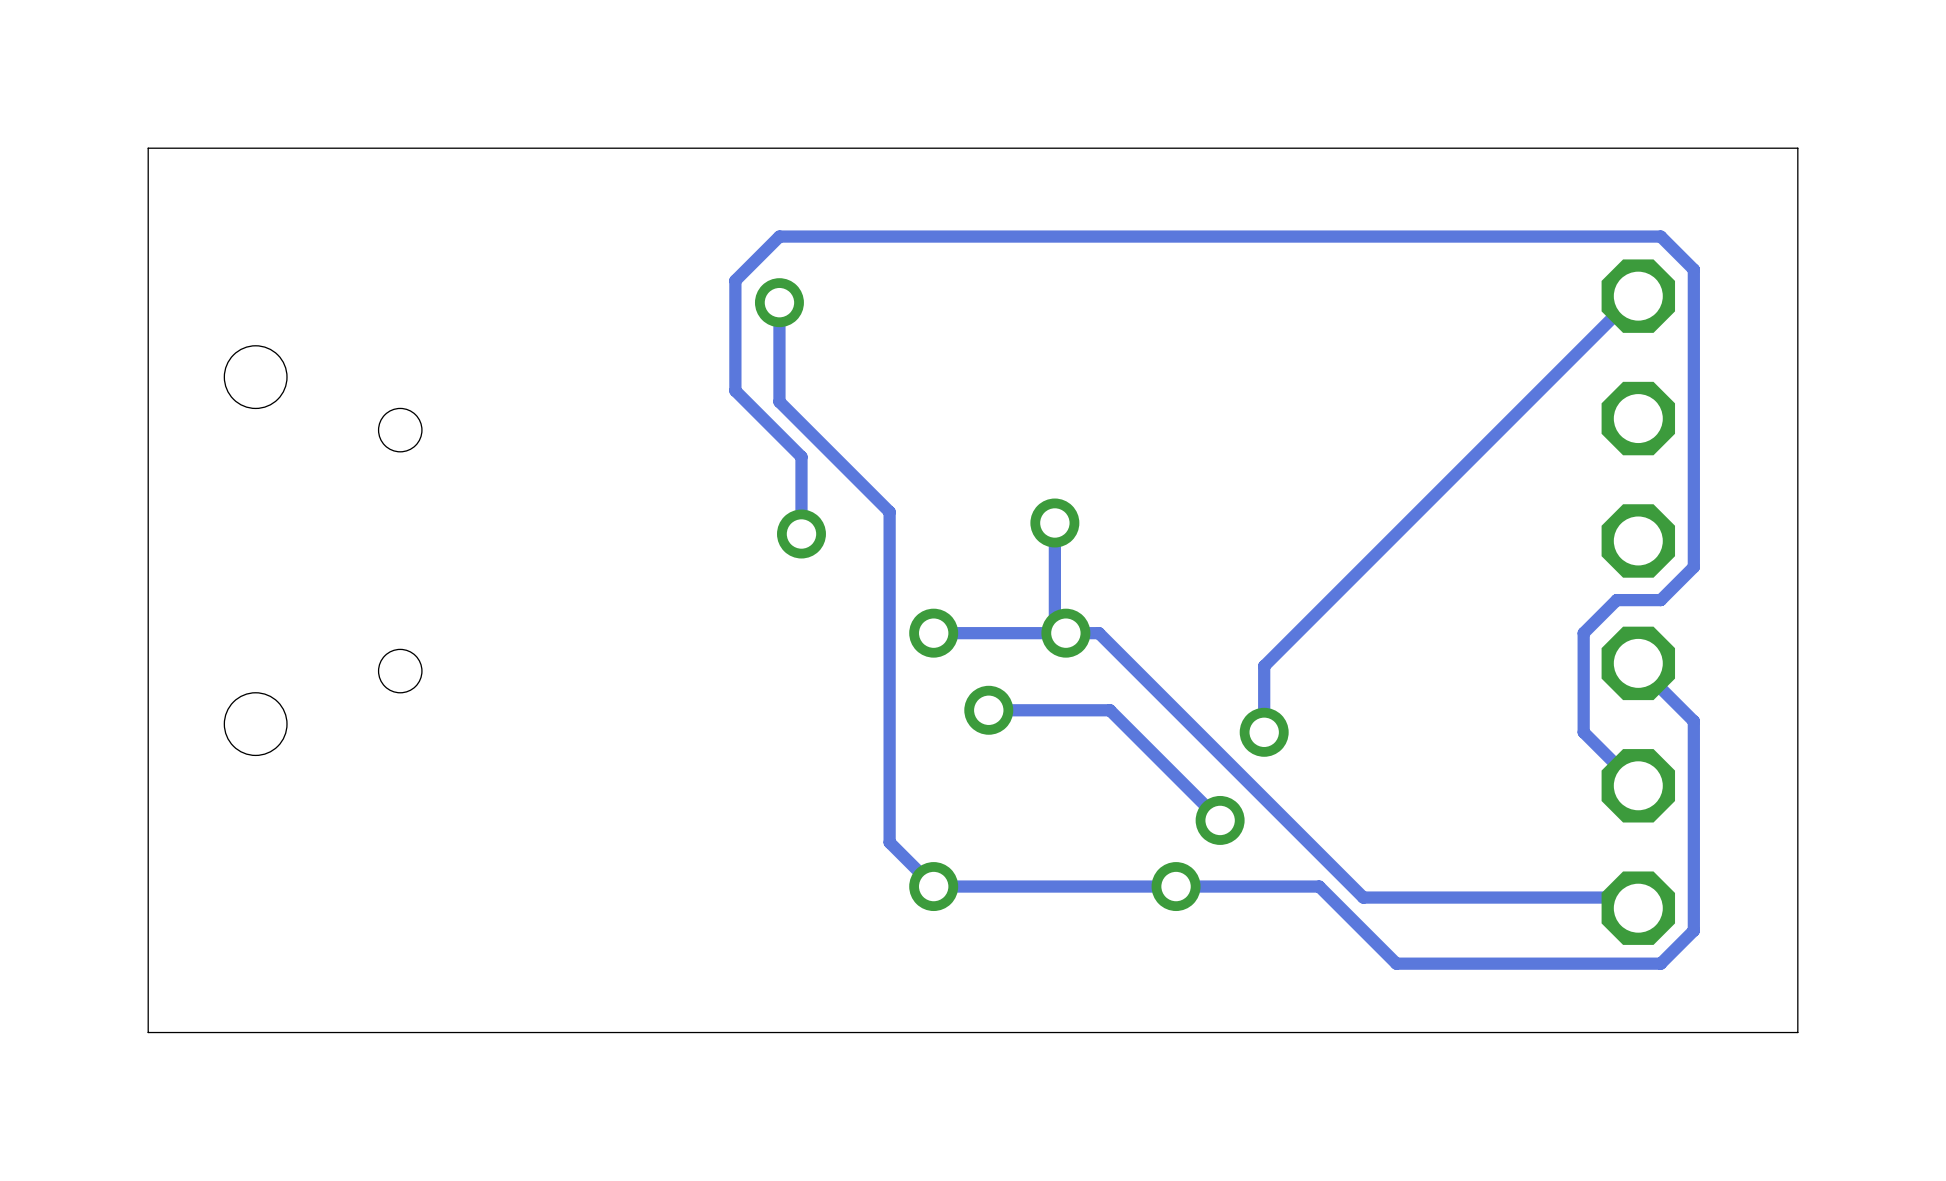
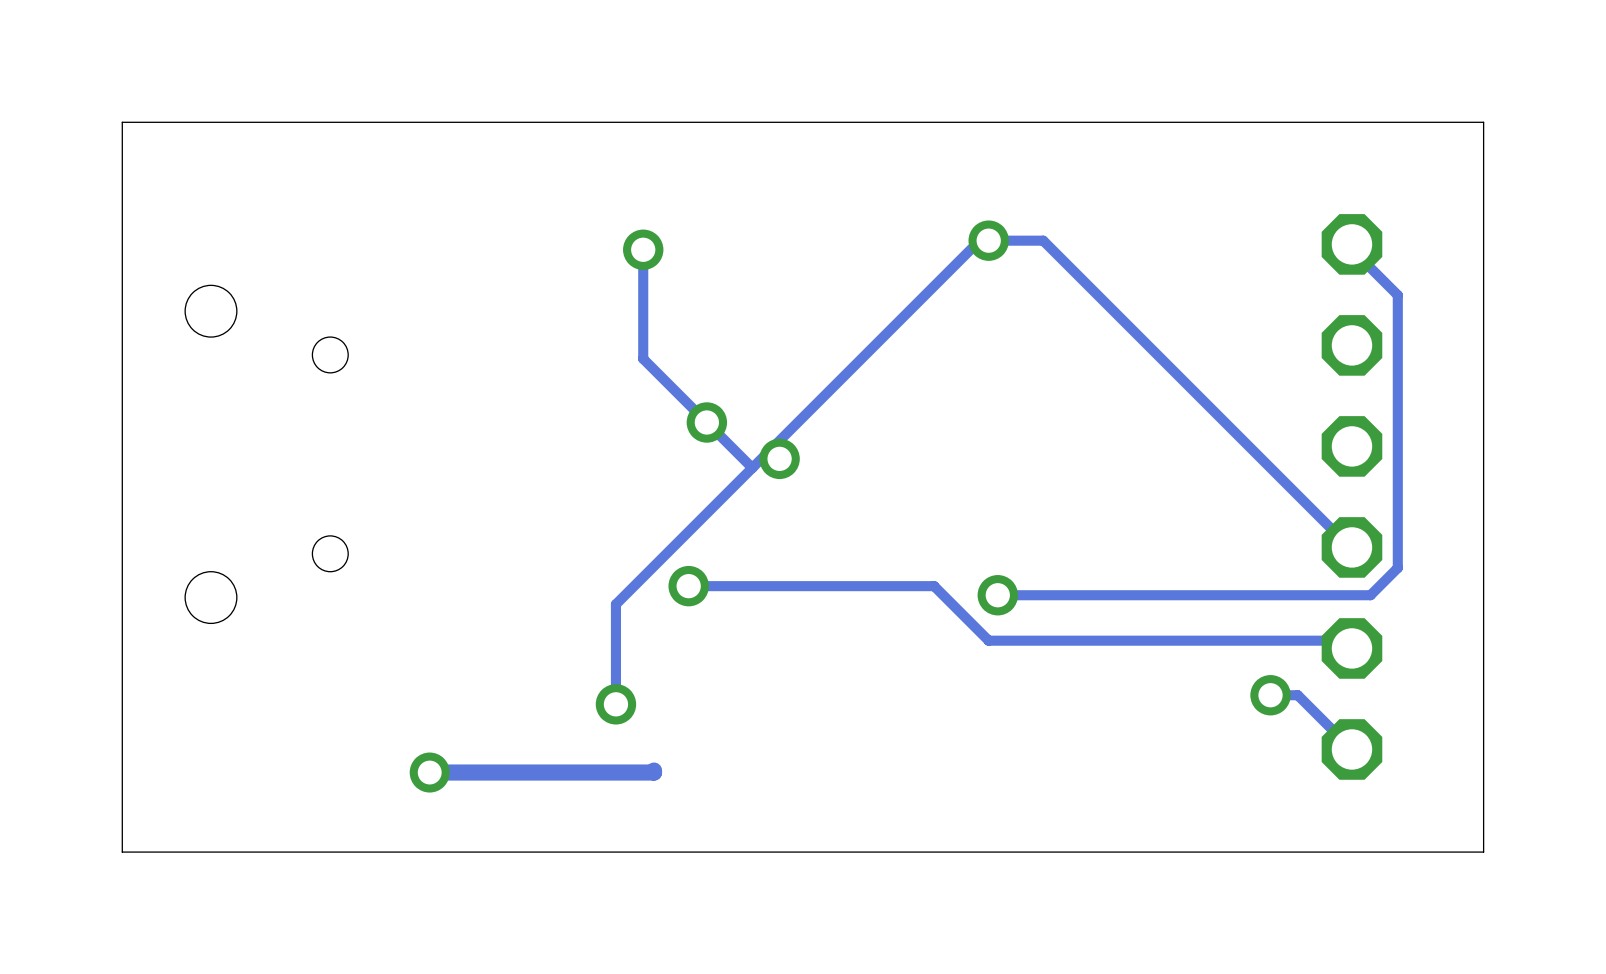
via: none -> (988, 240)
track: (1638, 296) (1627, 302) (1264, 666) (1264, 732) -> (1351, 244) (1352, 249) (1397, 295)
track: (1693, 357) (1693, 269) (1660, 236) (779, 236) (735, 280) (735, 390) (779, 434) -> (643, 331) (643, 358)
track: (779, 401) (889, 511) (889, 842) (933, 886) (1319, 886) (1396, 963) (1660, 963) (1693, 930) (1693, 721) (1638, 666) (1638, 663) -> (615, 704) (615, 604) (979, 240) (1043, 240) (1351, 547)
track: (801, 456) (801, 534) -> (661, 377) (752, 467)
track: (1054, 522) (1054, 622) (1065, 633) -> none
via: (1054, 522) -> none
via position: (801, 534) -> (706, 422)
via: none -> (779, 458)
track: (1693, 567) (1660, 600) (1616, 600) (1583, 633) (1583, 732) (1627, 776) -> (1397, 467) (1397, 567) (1370, 595) (997, 595)
track: (933, 633) (1098, 633) (1363, 897) (1627, 897) -> (1270, 695) (1297, 695) (1343, 740)
via: (933, 633) -> none
via: (1065, 633) -> none
via: none -> (688, 586)
track: none -> (815, 586) (688, 586)
via: (988, 710) -> none
track: (1109, 710) (1220, 820) -> (915, 586) (934, 586) (988, 640) (1343, 640)
via: none -> (997, 595)
via: (1264, 732) -> none
via: (1220, 820) -> none
via: none -> (1270, 695)
via: none -> (615, 704)
via: (933, 886) -> none
via: (1176, 886) -> none
track: none -> (654, 770) (654, 772) (429, 772)
via: none -> (429, 772)

